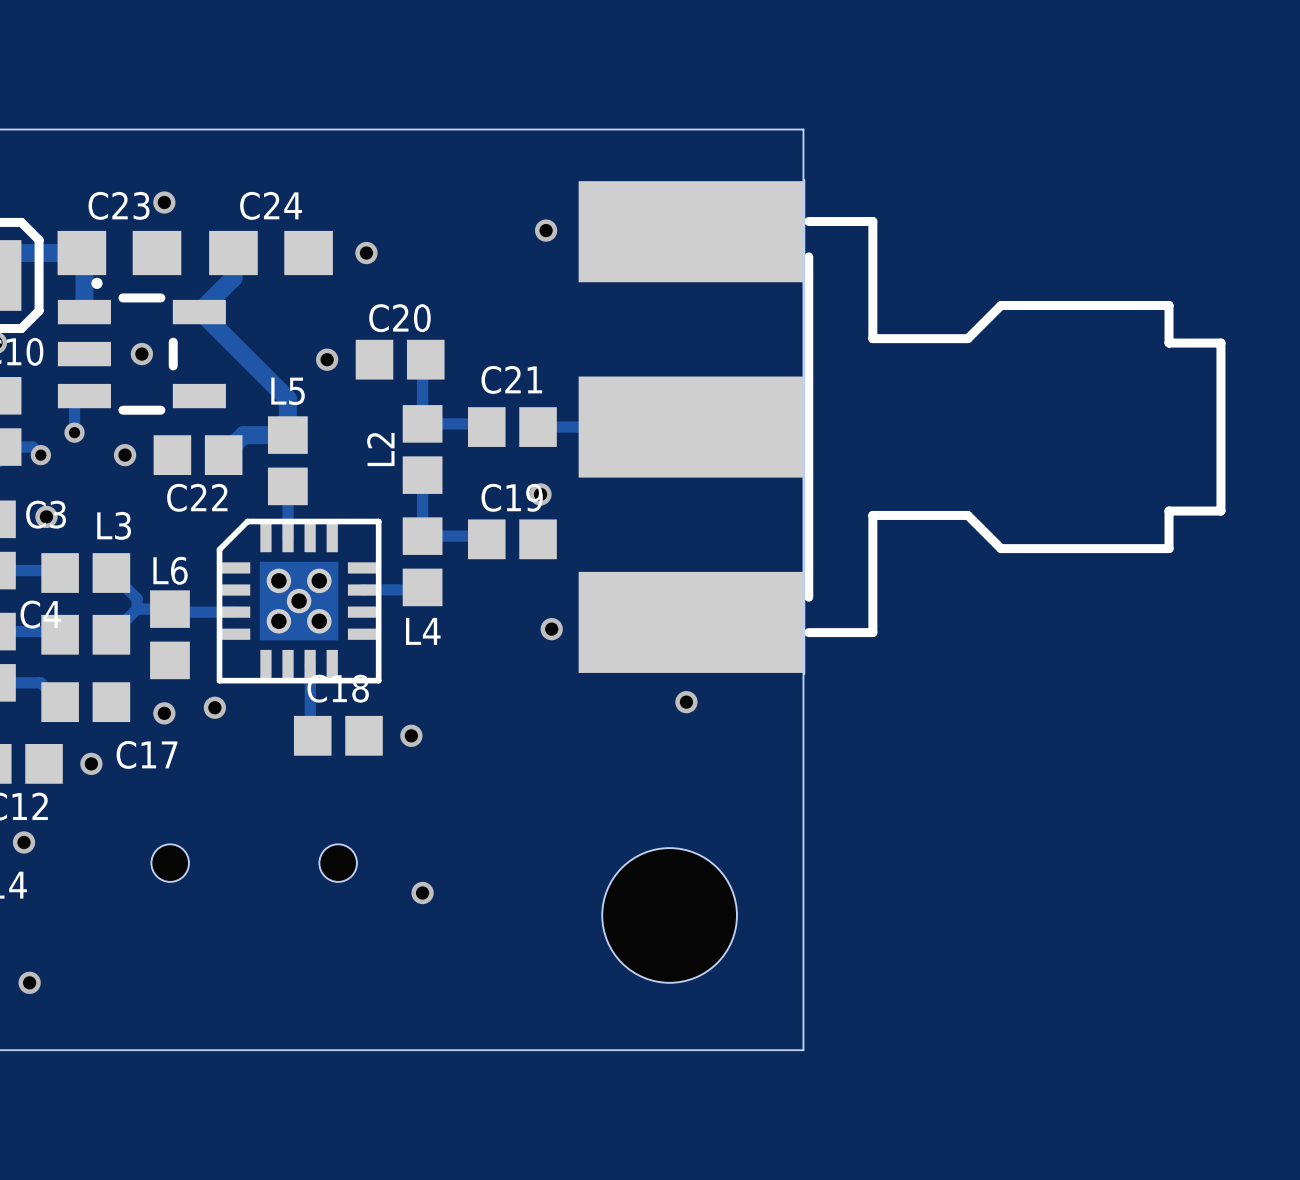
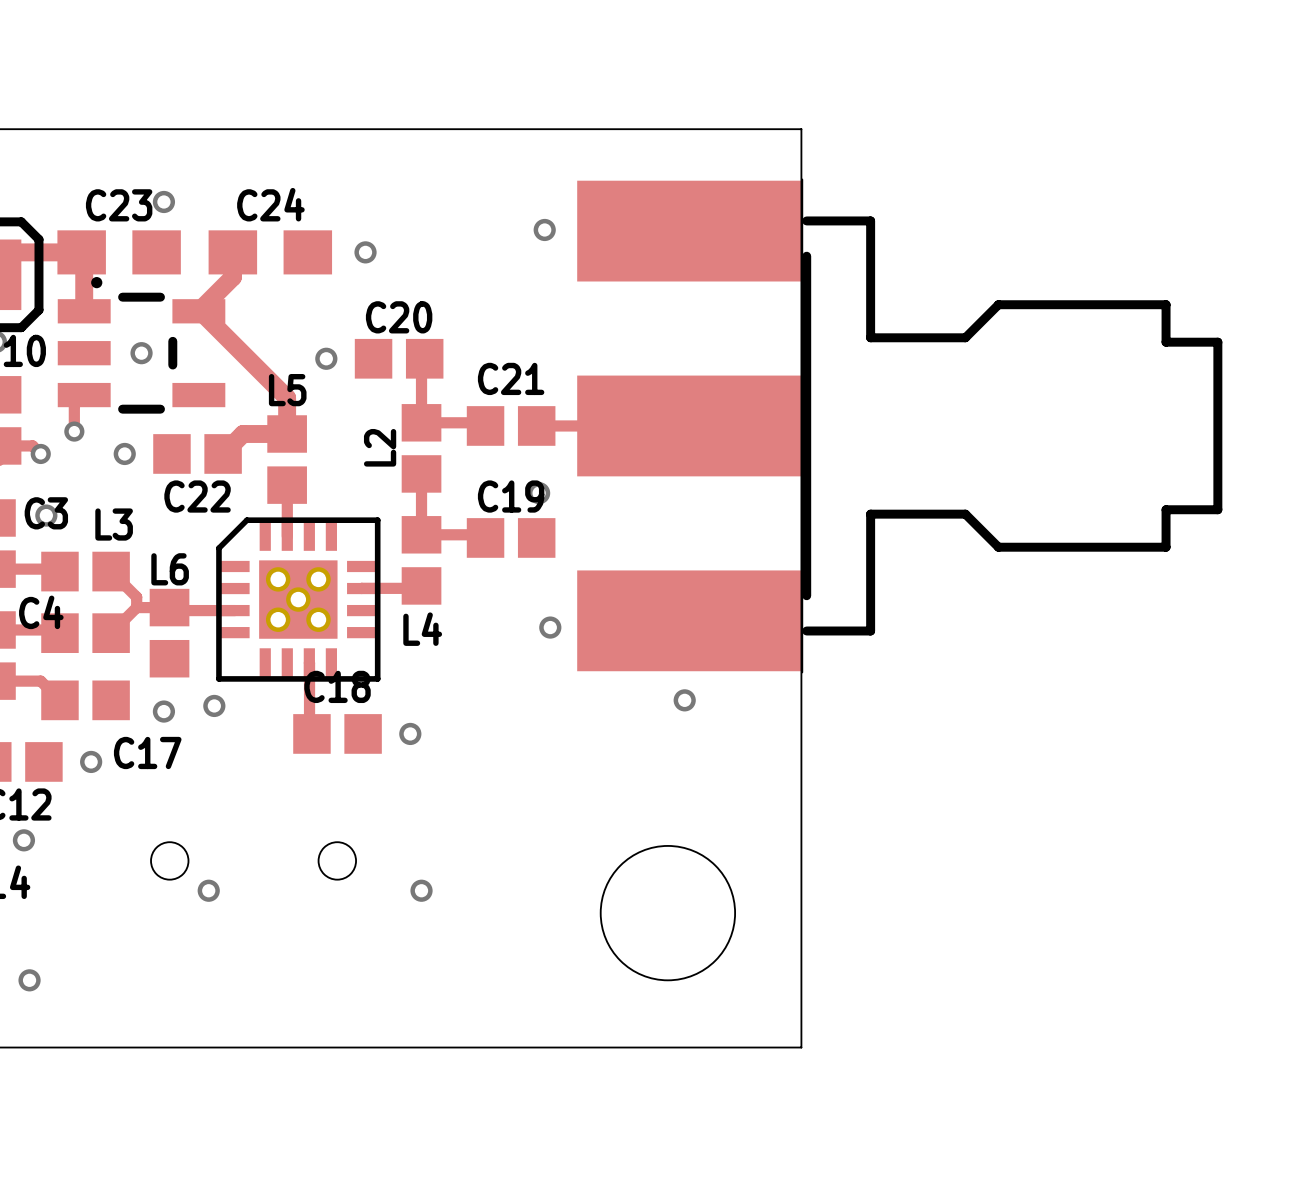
via: none -> (208, 890)

